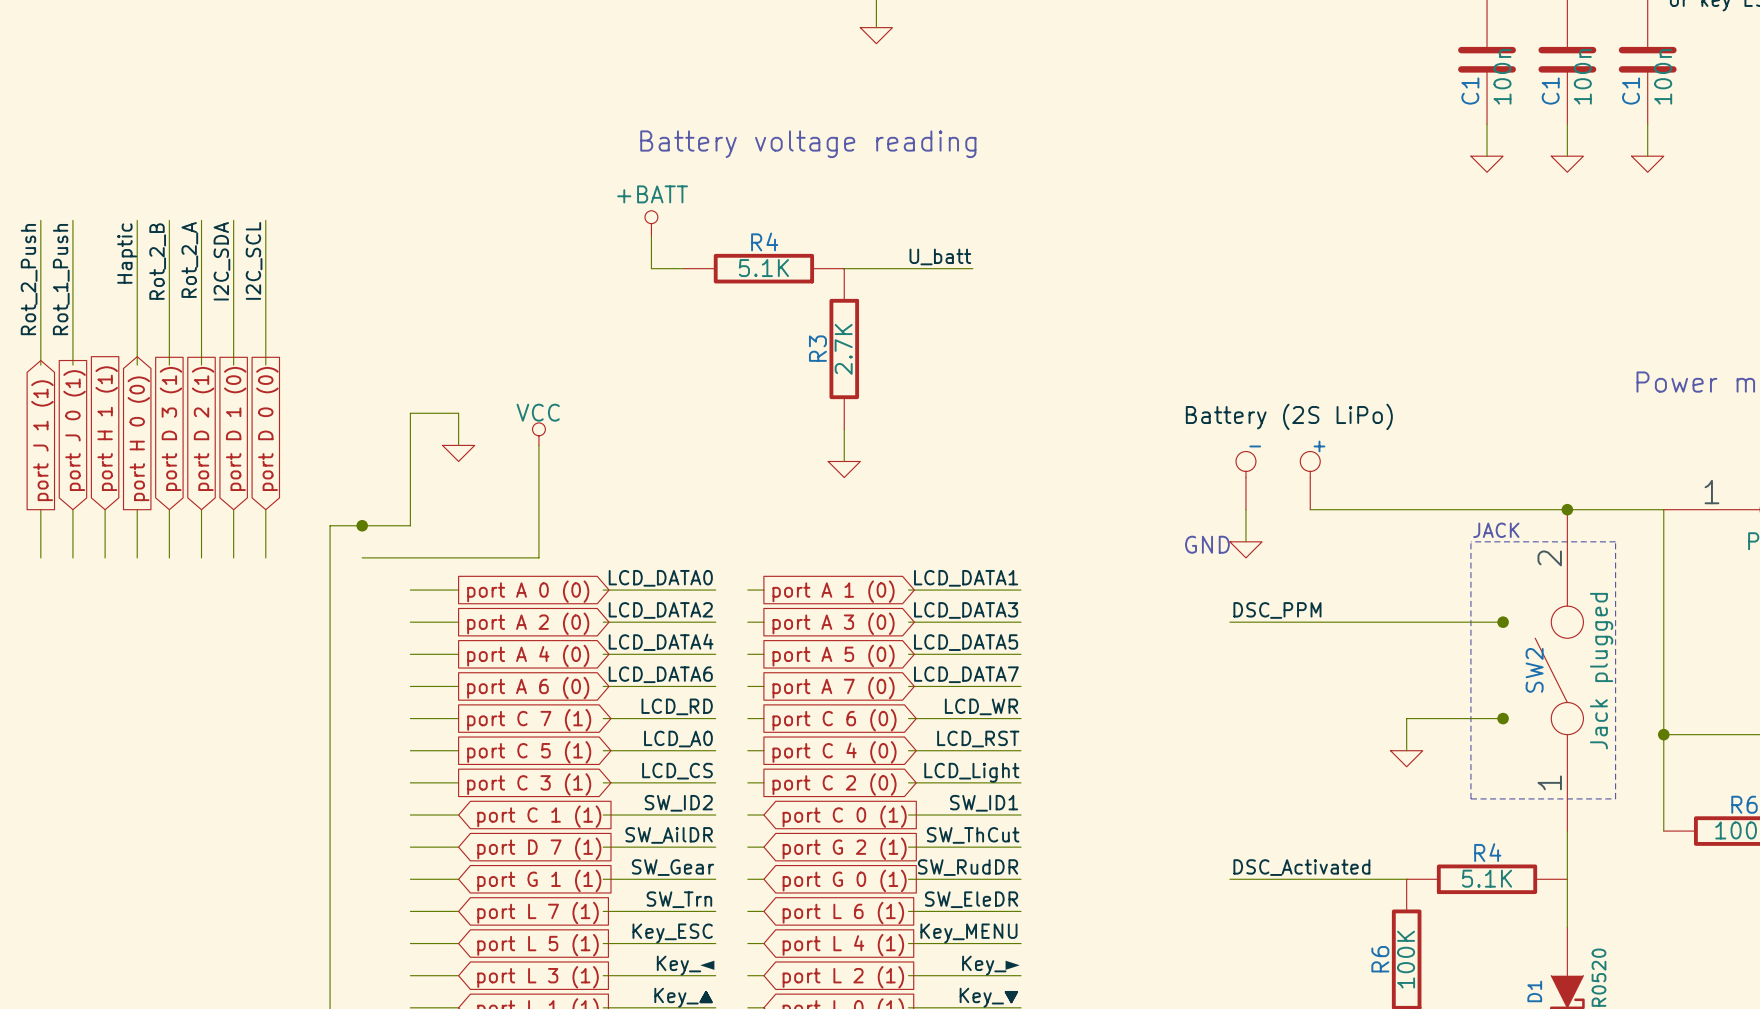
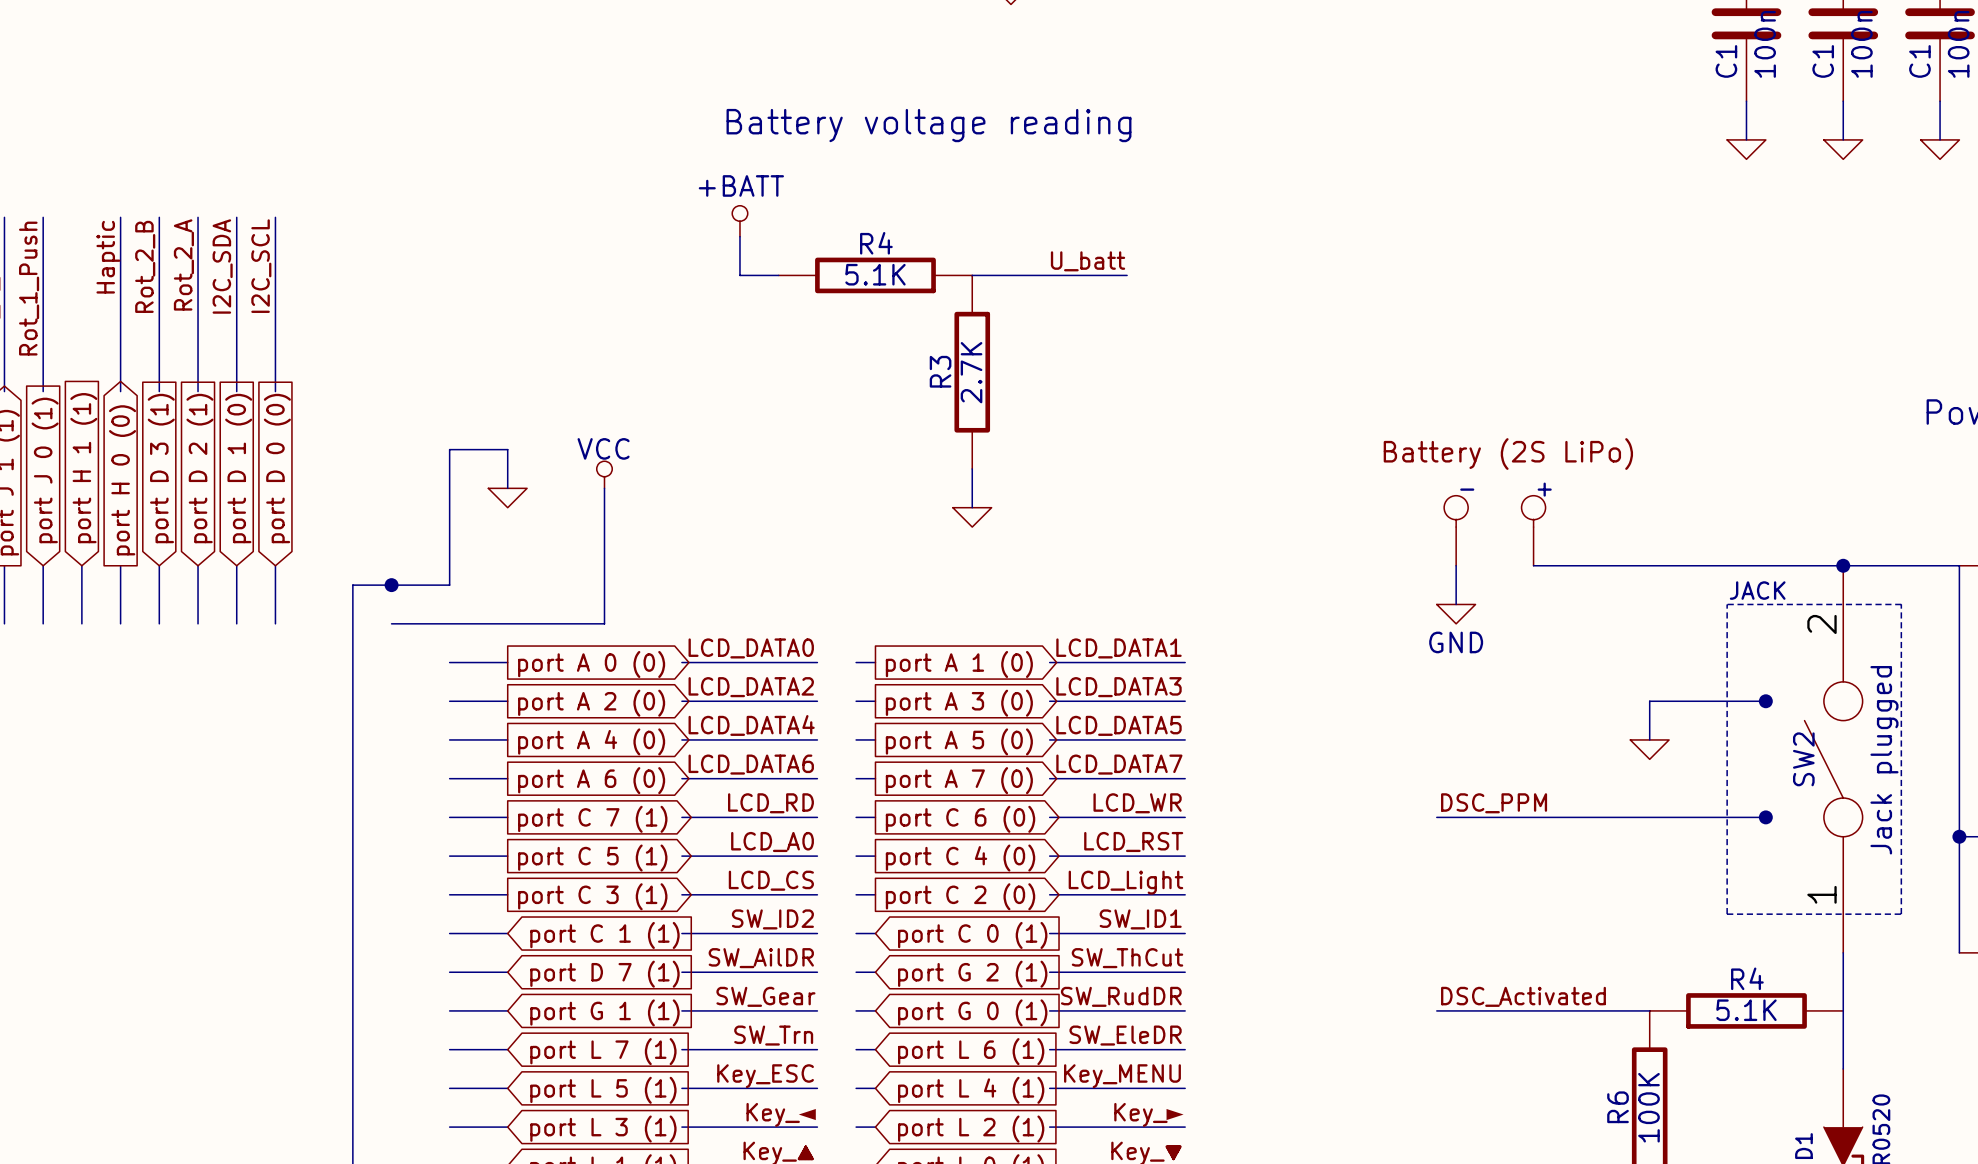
text: GND (1207, 544) -> none
power symbol text: none -> GND (1456, 642)
label position: DSC_PPM (1277, 610) -> DSC_PPM (1494, 803)
wire: (1229, 622) (1406, 622) -> (1649, 739) (1649, 701)
wire: (1406, 718) (1406, 750) -> (1649, 817) (1436, 817)
power symbol position: (1406, 758) -> (1649, 749)

